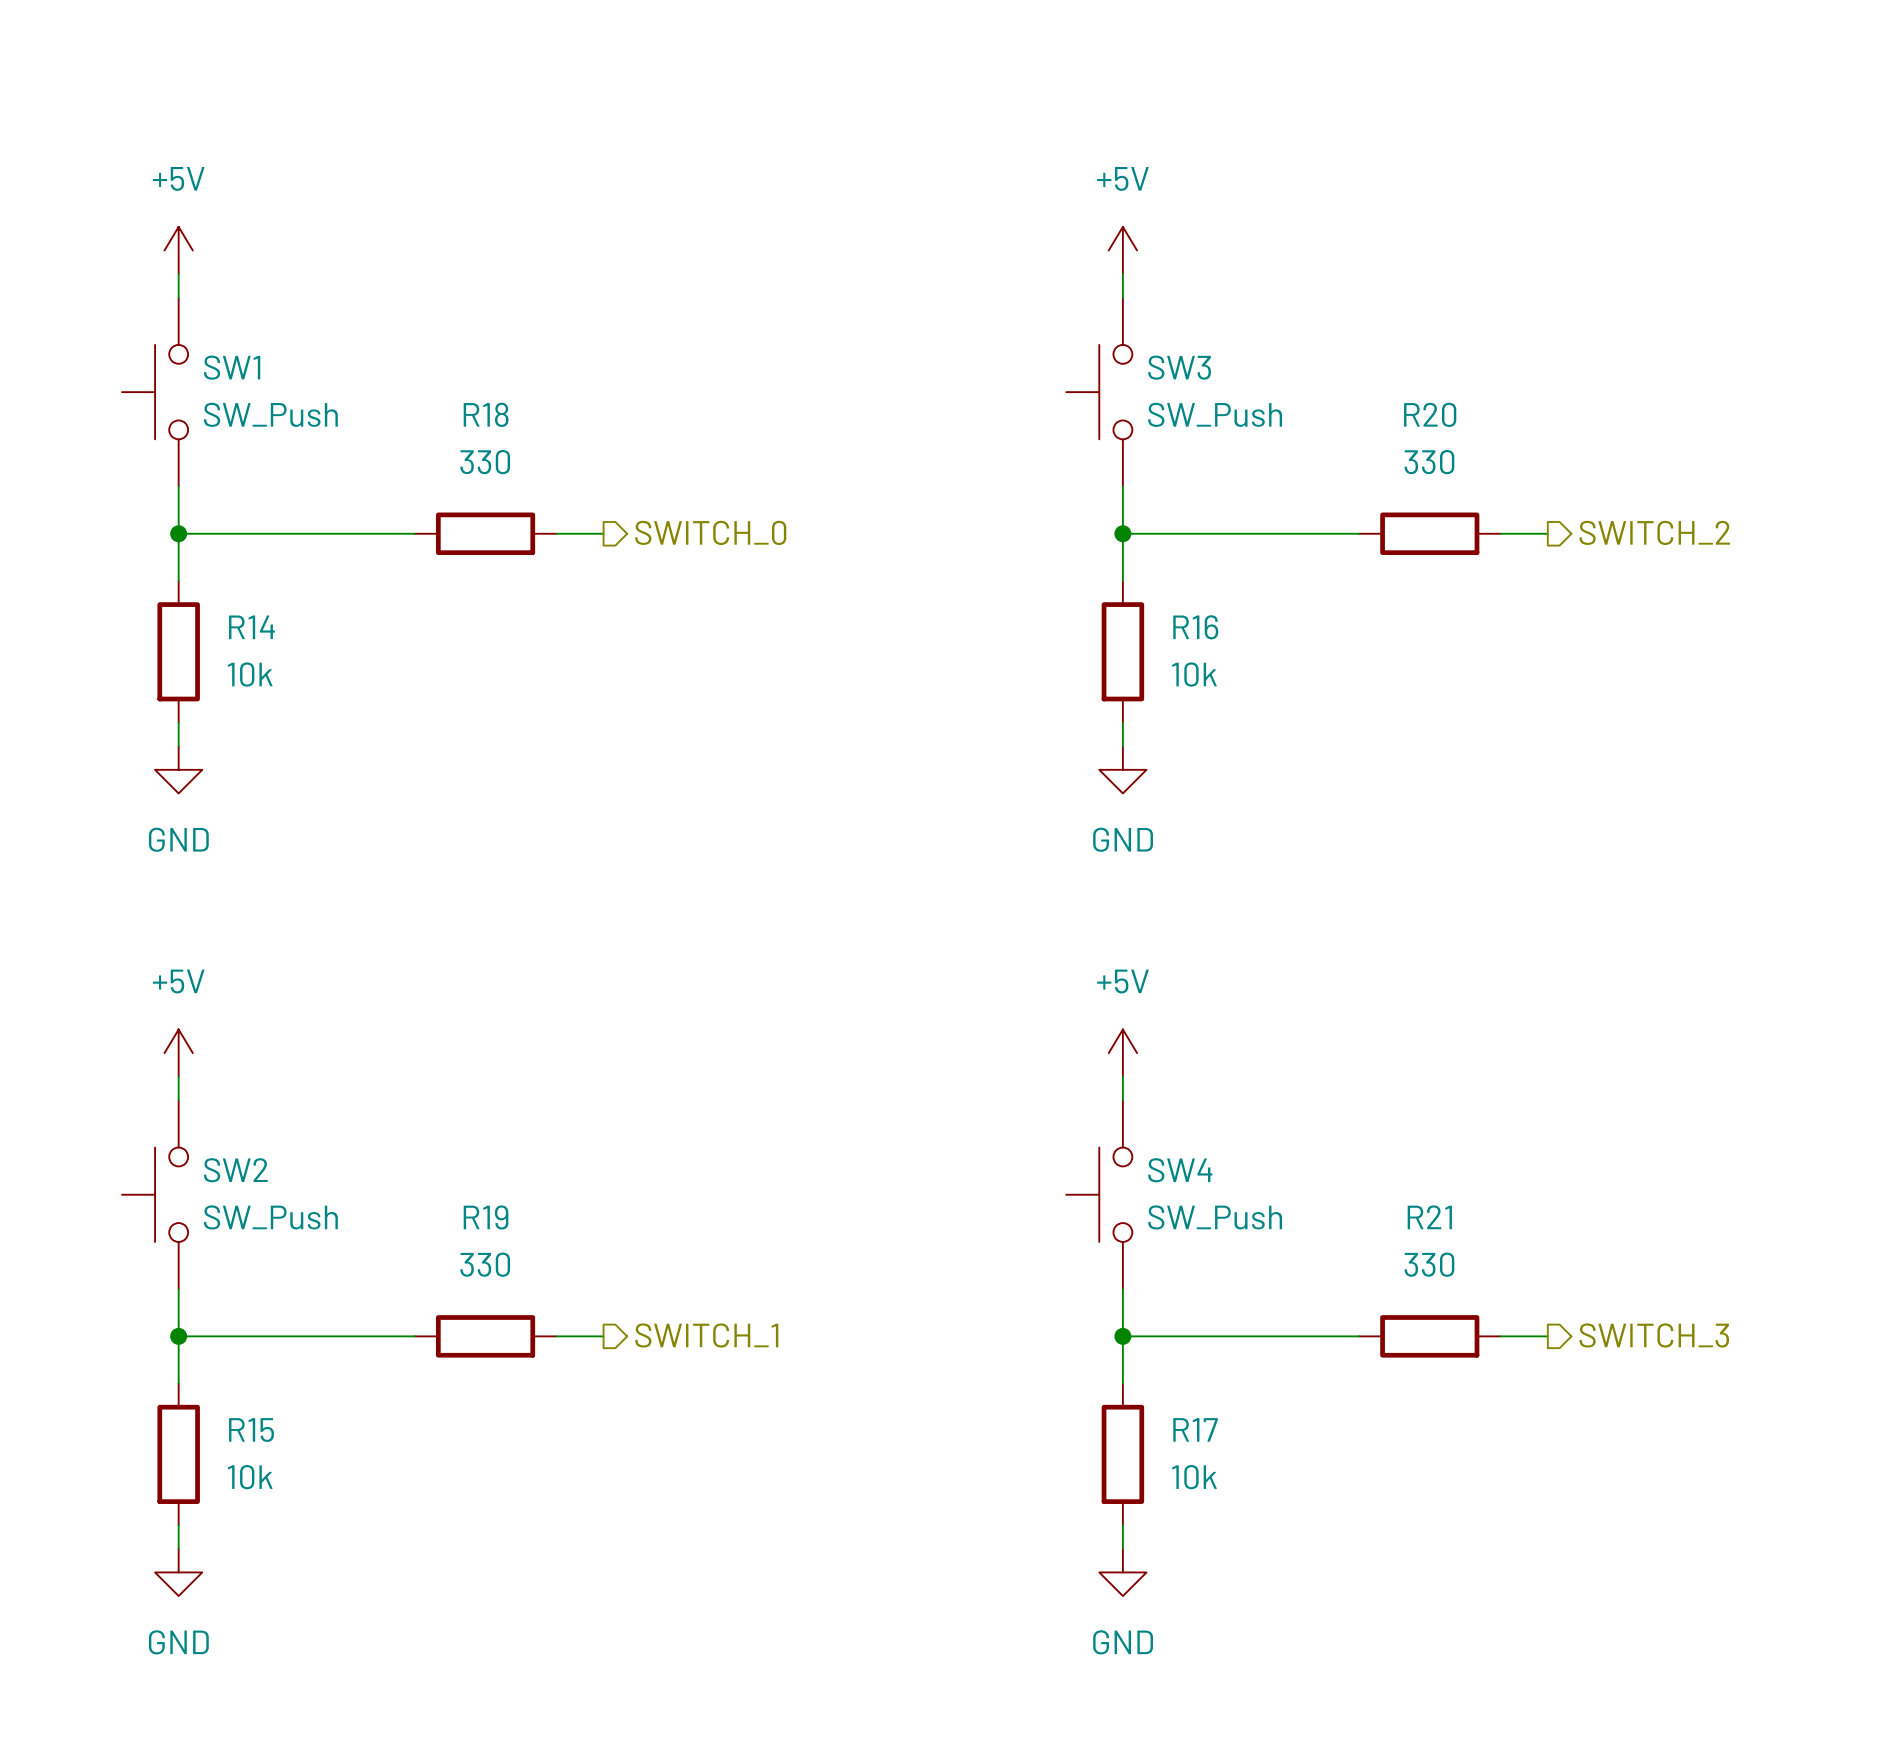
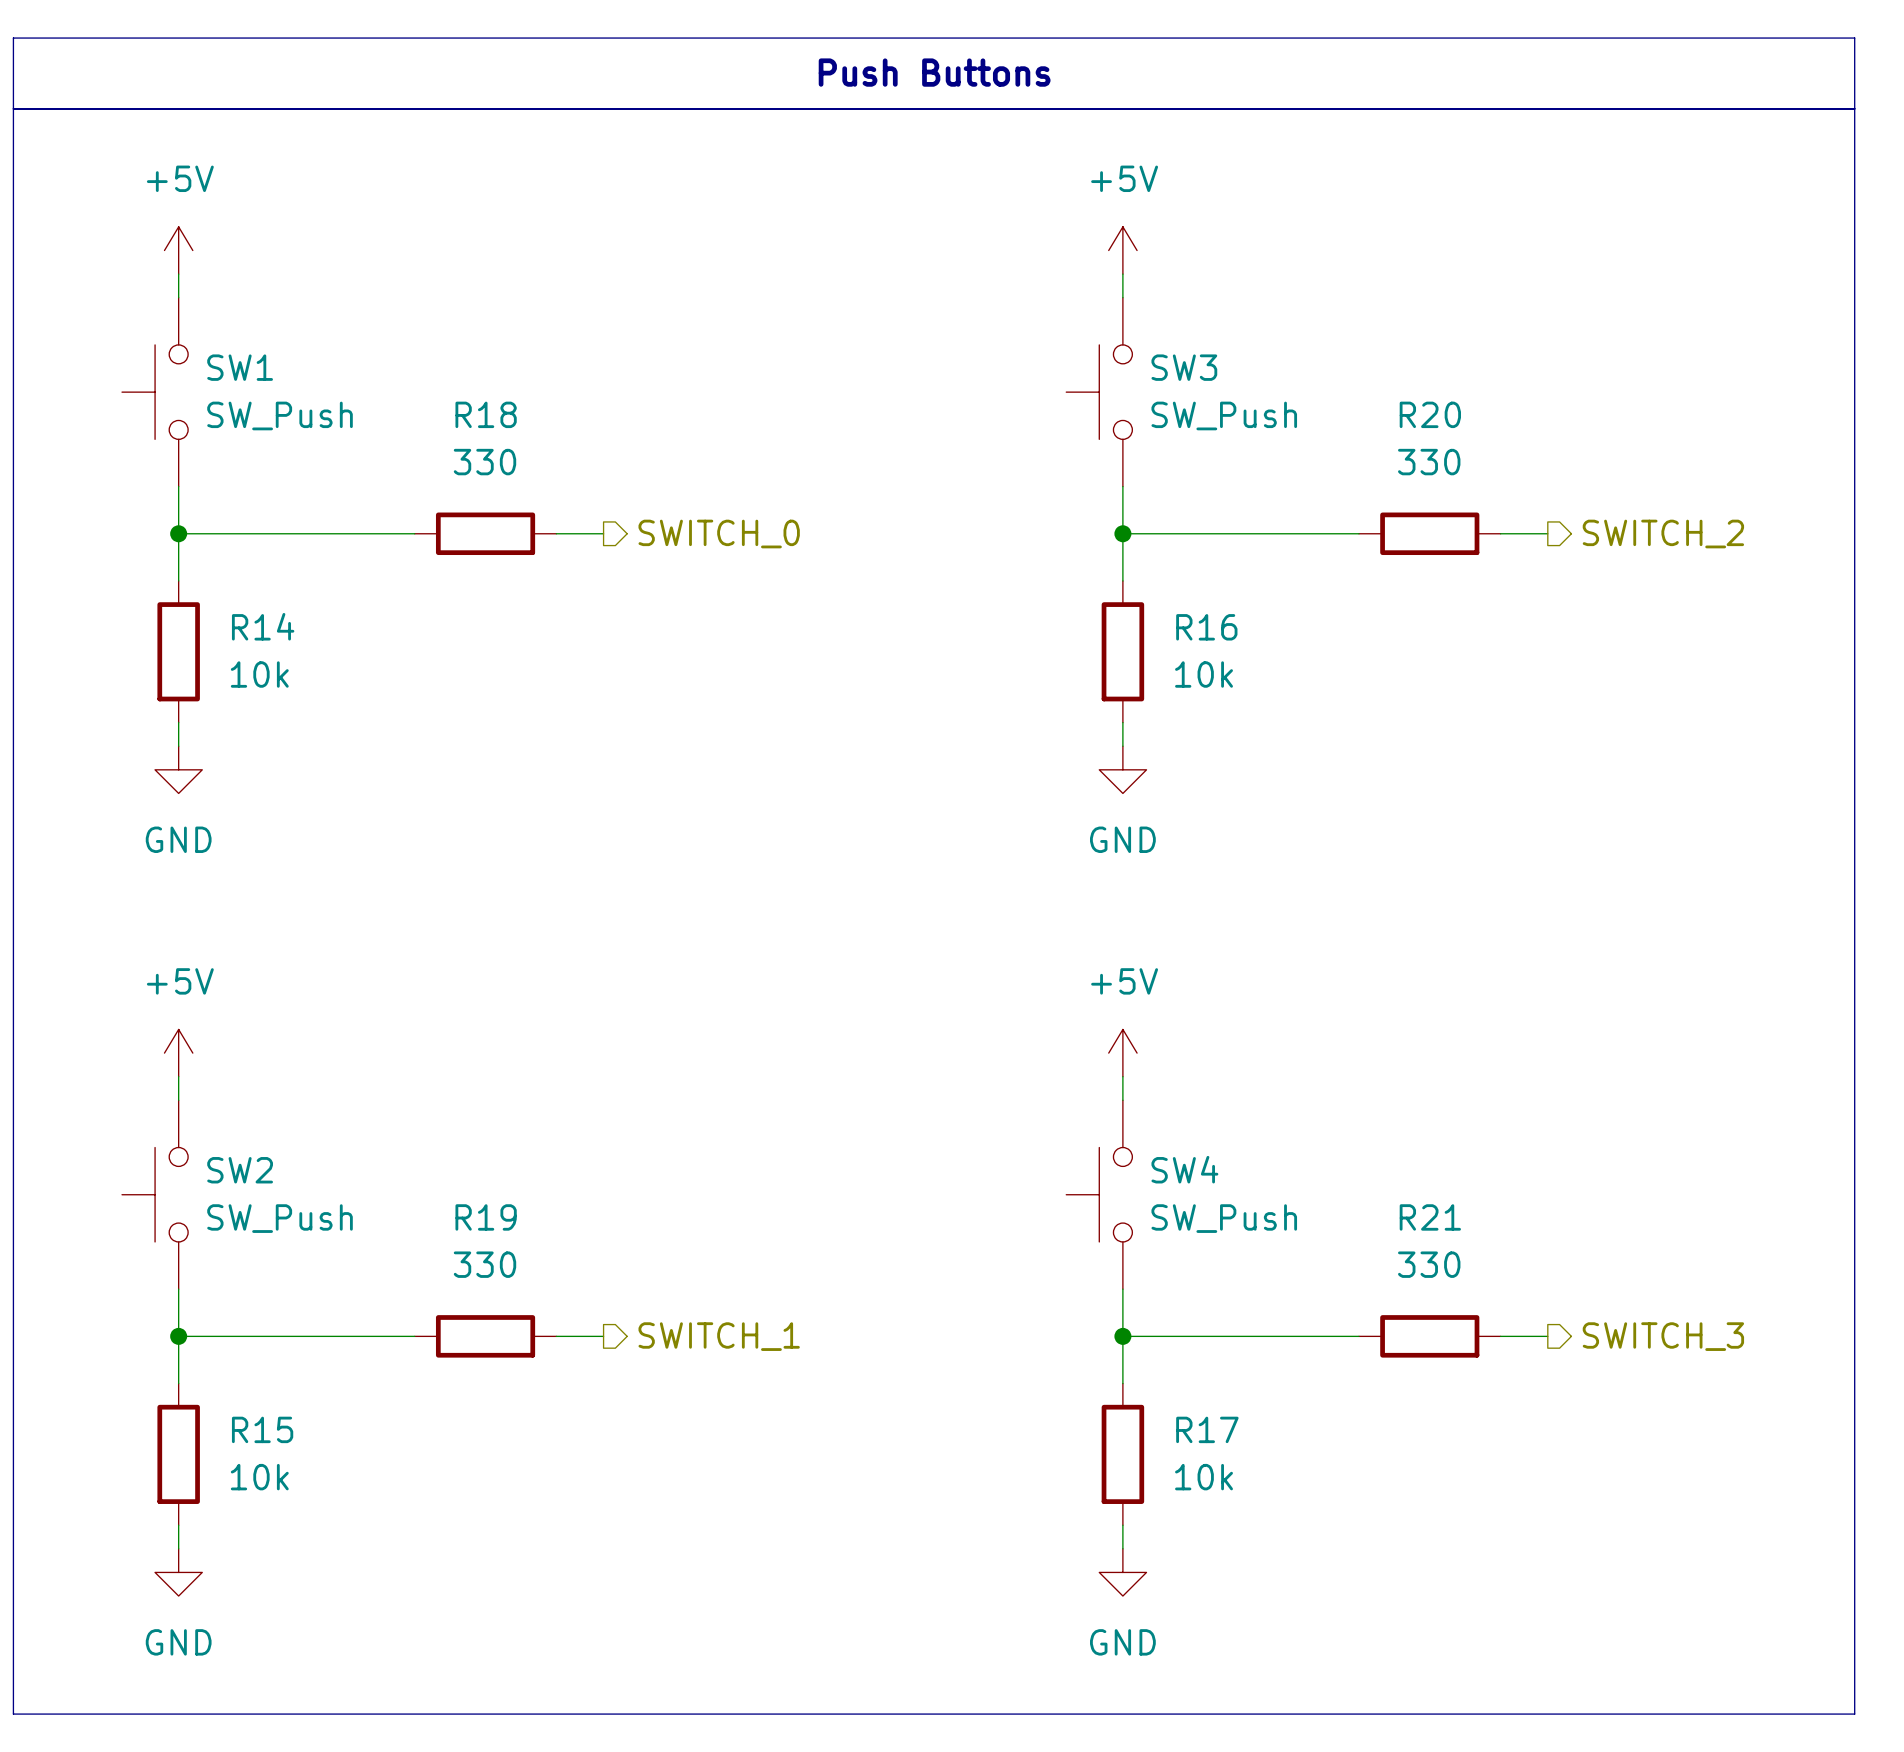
line: none -> (13, 38) (13, 1714) (1854, 1714) (1854, 38) (13, 38)
text: none -> Push Buttons (934, 72)
line: none -> (13, 108) (1854, 108)

